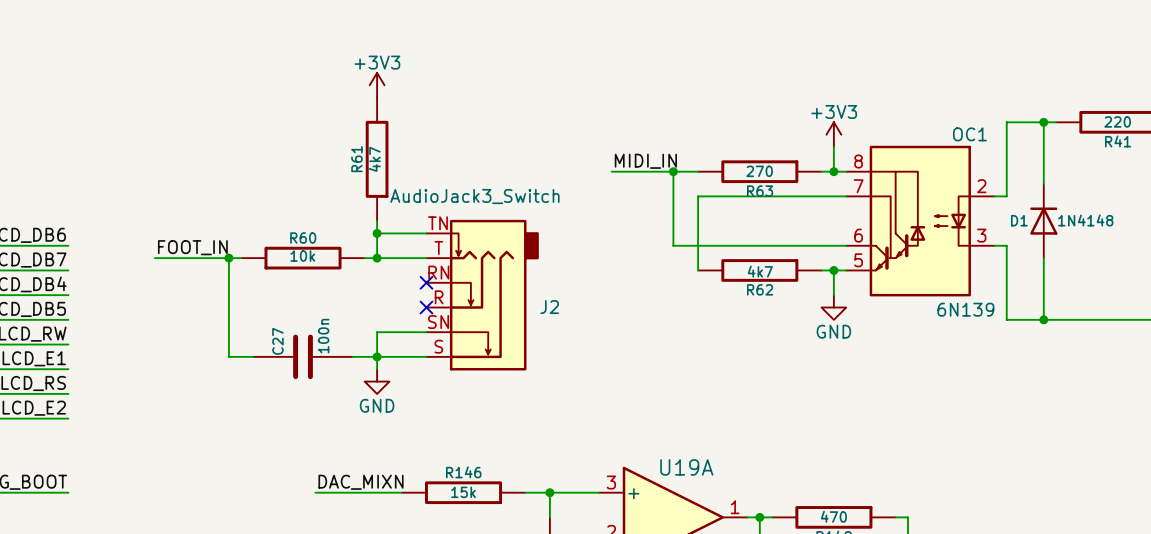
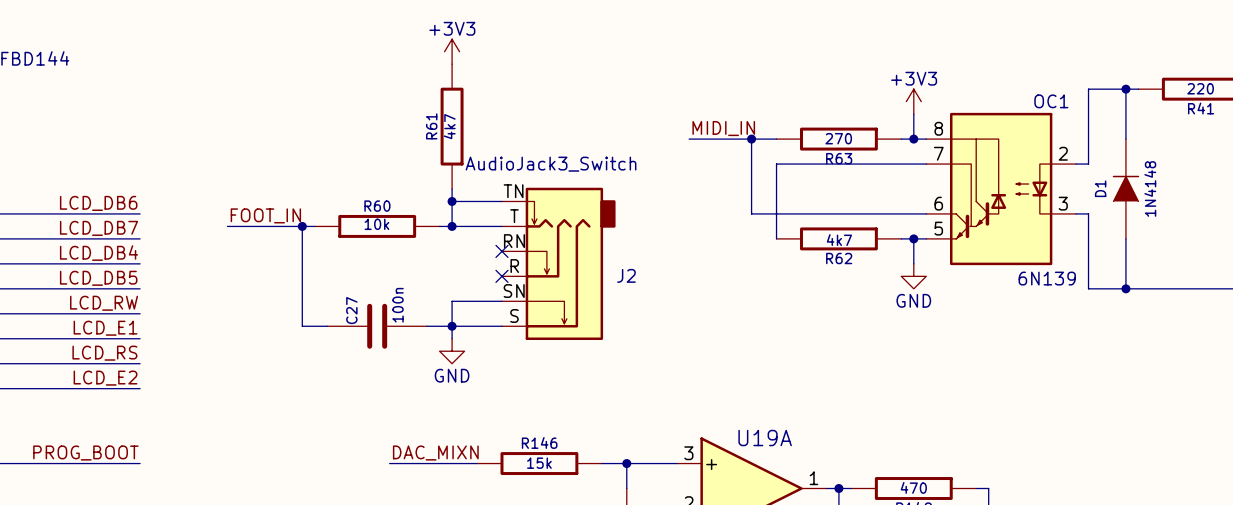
D1 symbol: [1030, 184, 1058, 259] -> [1112, 139, 1140, 239]

